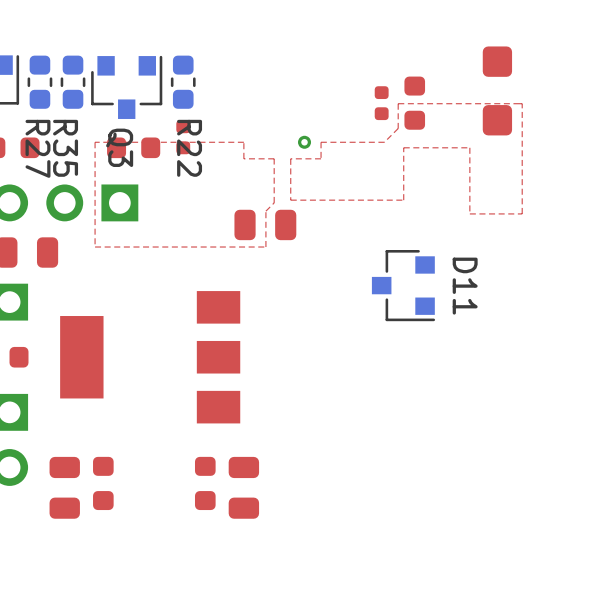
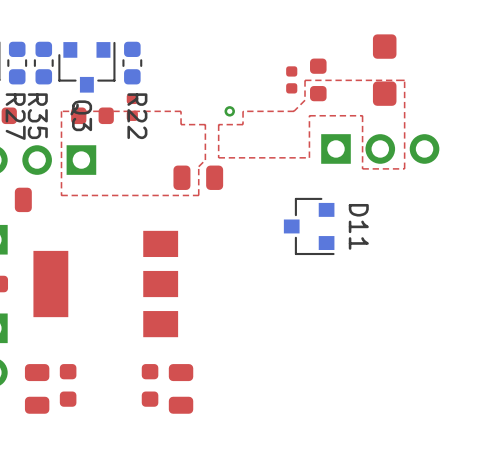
part: none -> (380, 148)

